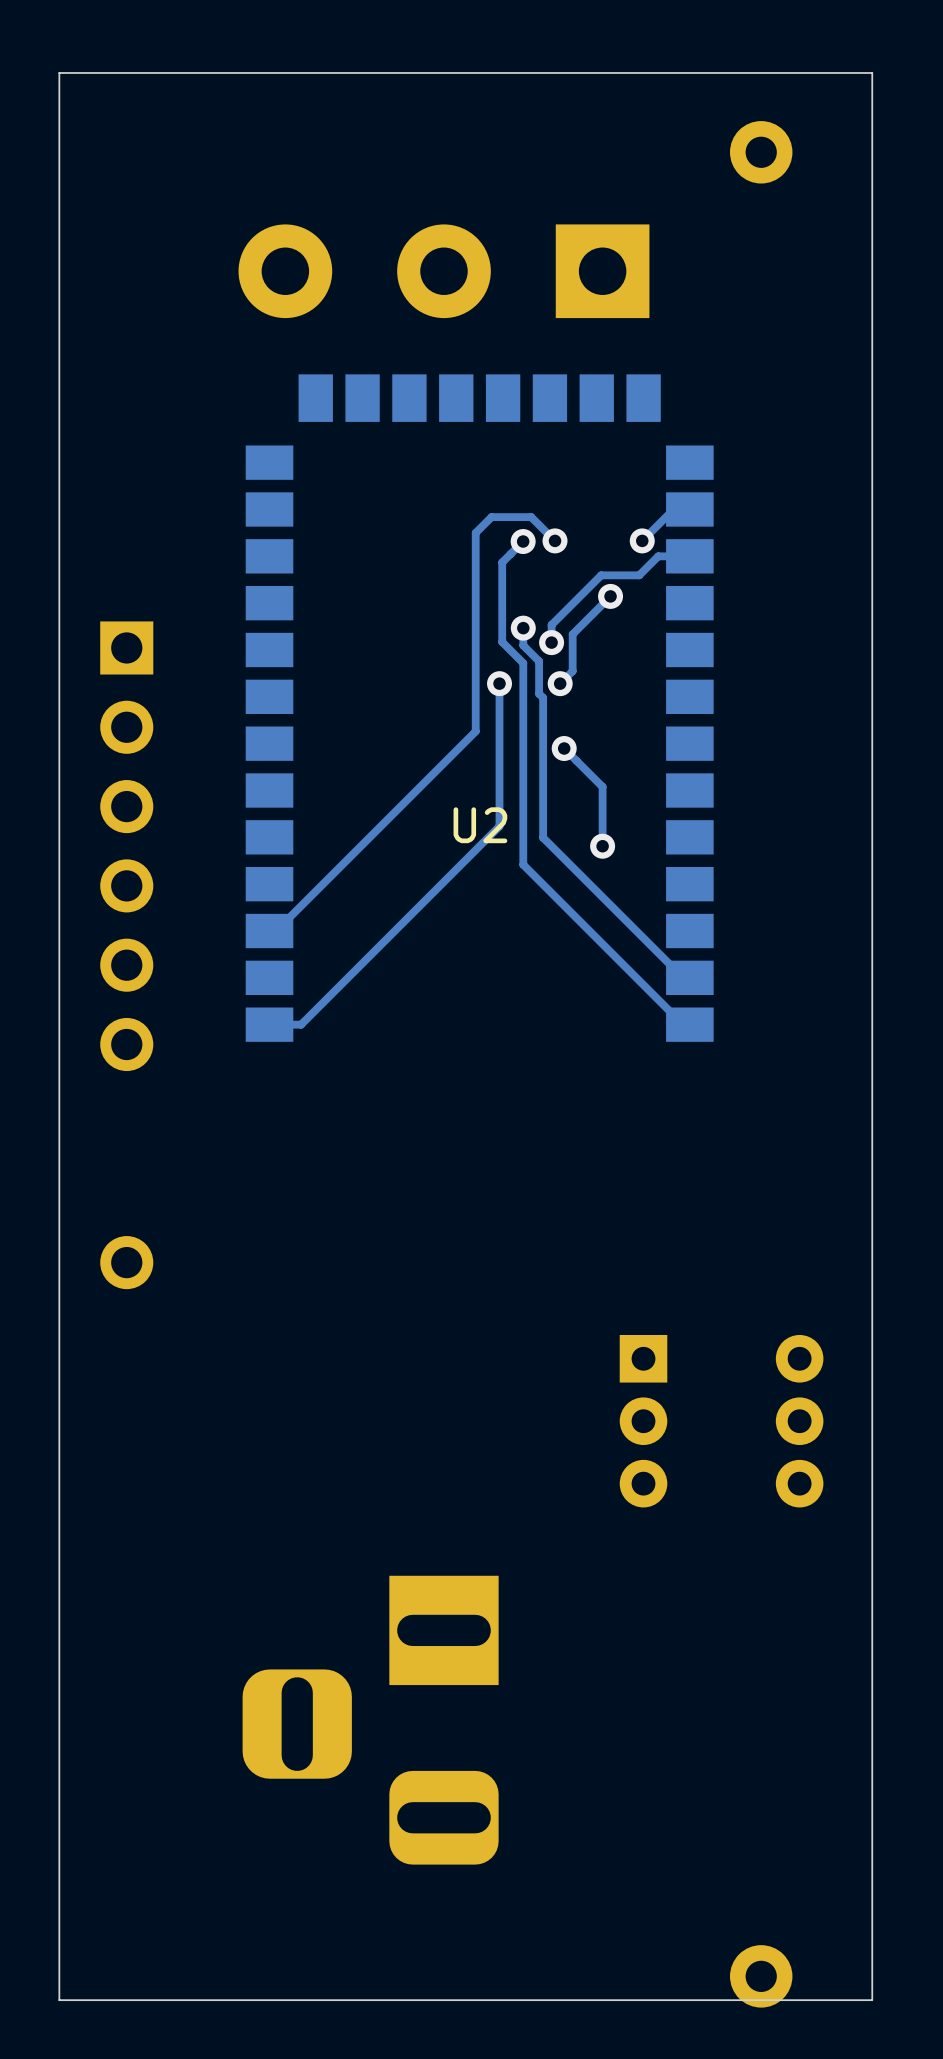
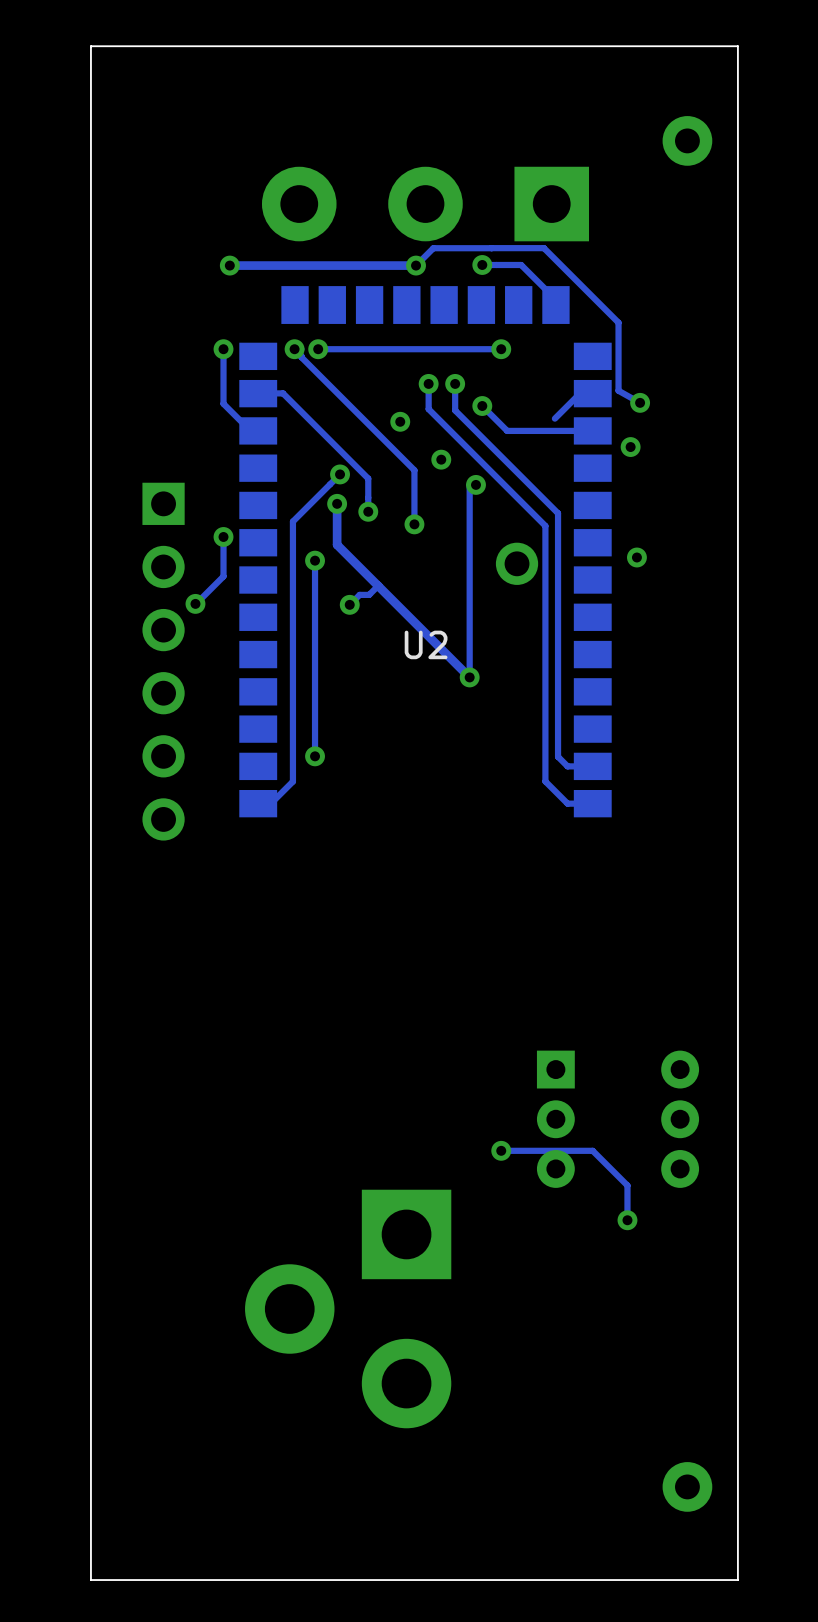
part position: (761, 152) -> (687, 140)
part position: (443, 271) -> (425, 204)
track: none -> (482, 264) (521, 264) (555, 299) (555, 305)
via: none -> (482, 264)
track: none -> (229, 265) (416, 265) (433, 248) (543, 248) (618, 322) (618, 390) (640, 402)
via: none -> (229, 265)
via: none -> (416, 265)
track: none -> (223, 349) (223, 403) (244, 424) (253, 424)
via: none -> (223, 349)
via: none -> (294, 349)
track: none -> (301, 349) (294, 349) (414, 470) (414, 524)
via: none -> (318, 349)
track: none -> (501, 349) (318, 349)
via: none -> (501, 349)
via: none -> (428, 383)
via: none -> (455, 383)
track: none -> (267, 393) (283, 393) (368, 478) (368, 511)
via: none -> (640, 402)
track: (555, 540) (531, 517) (491, 517) (475, 532) (475, 731) (276, 931) (269, 931) -> none
via position: (555, 540) -> (482, 406)
via: (642, 540) -> none
track: (523, 541) (502, 562) (502, 642) (523, 663) (523, 864) (683, 1024) -> (428, 383) (428, 409) (545, 525) (545, 781) (567, 803) (587, 803)
via: (523, 541) -> none
via: none -> (400, 421)
track: (658, 556) (639, 575) (601, 575) (551, 624) (551, 642) -> (567, 430) (507, 430) (482, 406)
via: none -> (630, 447)
via: none -> (441, 459)
track: (610, 596) (572, 634) (572, 671) (560, 683) -> none
via: (610, 596) -> none
track: none -> (340, 474) (292, 521) (292, 781) (267, 806)
via: none -> (340, 474)
track: none -> (475, 484) (469, 484) (469, 677) (337, 544) (337, 503)
via: none -> (475, 484)
track: (523, 628) (523, 645) (539, 661) (539, 693) (543, 697) (543, 837) (683, 977) -> (455, 383) (455, 410) (558, 513) (558, 756) (567, 766) (587, 766)
via: (523, 628) -> none
via: (551, 642) -> none
via: none -> (337, 503)
via: none -> (368, 511)
track: (499, 683) (499, 826) (301, 1024) (269, 1024) -> none
via position: (499, 683) -> (414, 524)
via: (560, 683) -> none
track: none -> (223, 536) (223, 576) (195, 603)
via: none -> (223, 536)
via: none -> (636, 557)
track: none -> (315, 560) (315, 756)
via: none -> (315, 560)
track: (564, 748) (602, 786) (602, 846) -> none
via: (564, 748) -> none
track: none -> (378, 585) (369, 594) (359, 594) (349, 604)
via: none -> (195, 603)
via: none -> (349, 604)
part position: (126, 846) -> (163, 661)
via: (602, 846) -> none
via: none -> (469, 677)
via: none -> (315, 756)
part position: (126, 1262) -> (517, 563)
track: none -> (501, 1150) (592, 1150) (627, 1185) (627, 1220)
via: none -> (501, 1150)
via: none -> (627, 1220)
part: none -> (348, 1309)
part: (370, 1720) -> none
part position: (761, 1976) -> (687, 1486)

